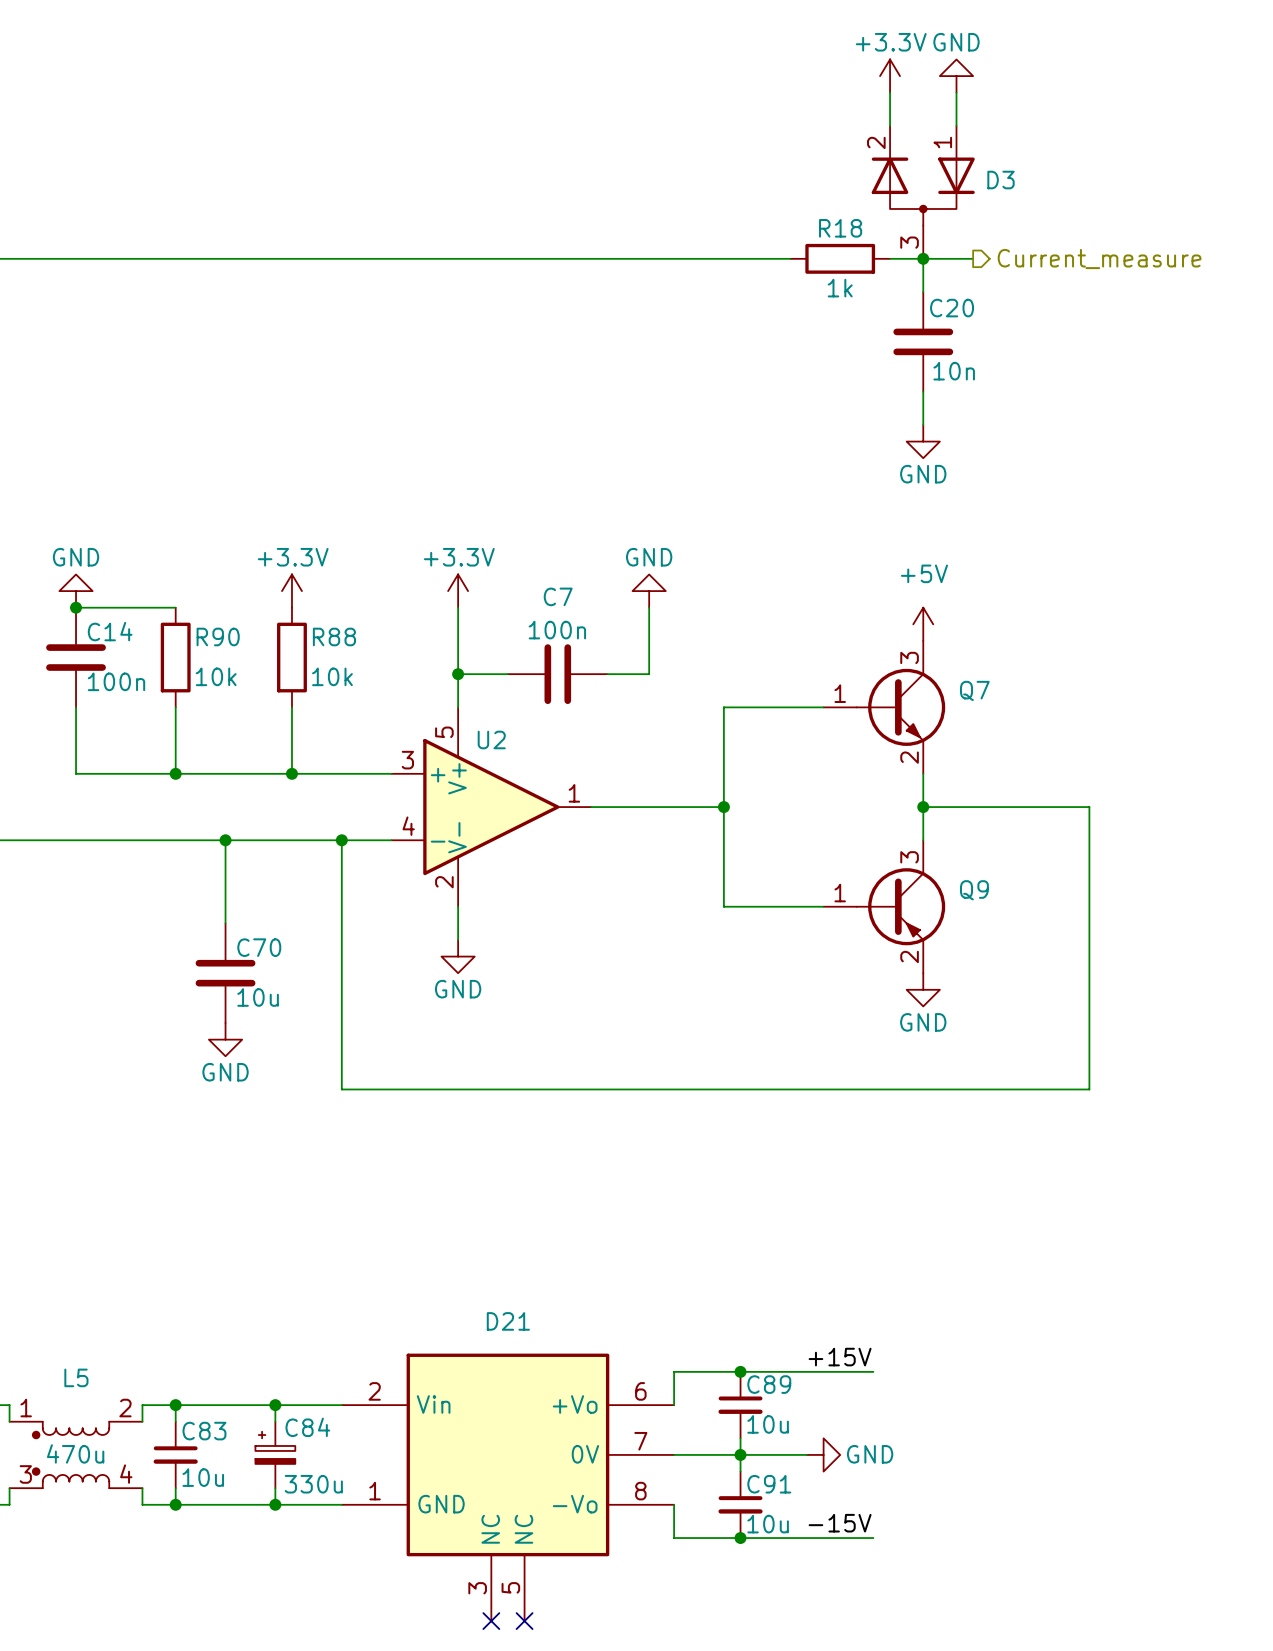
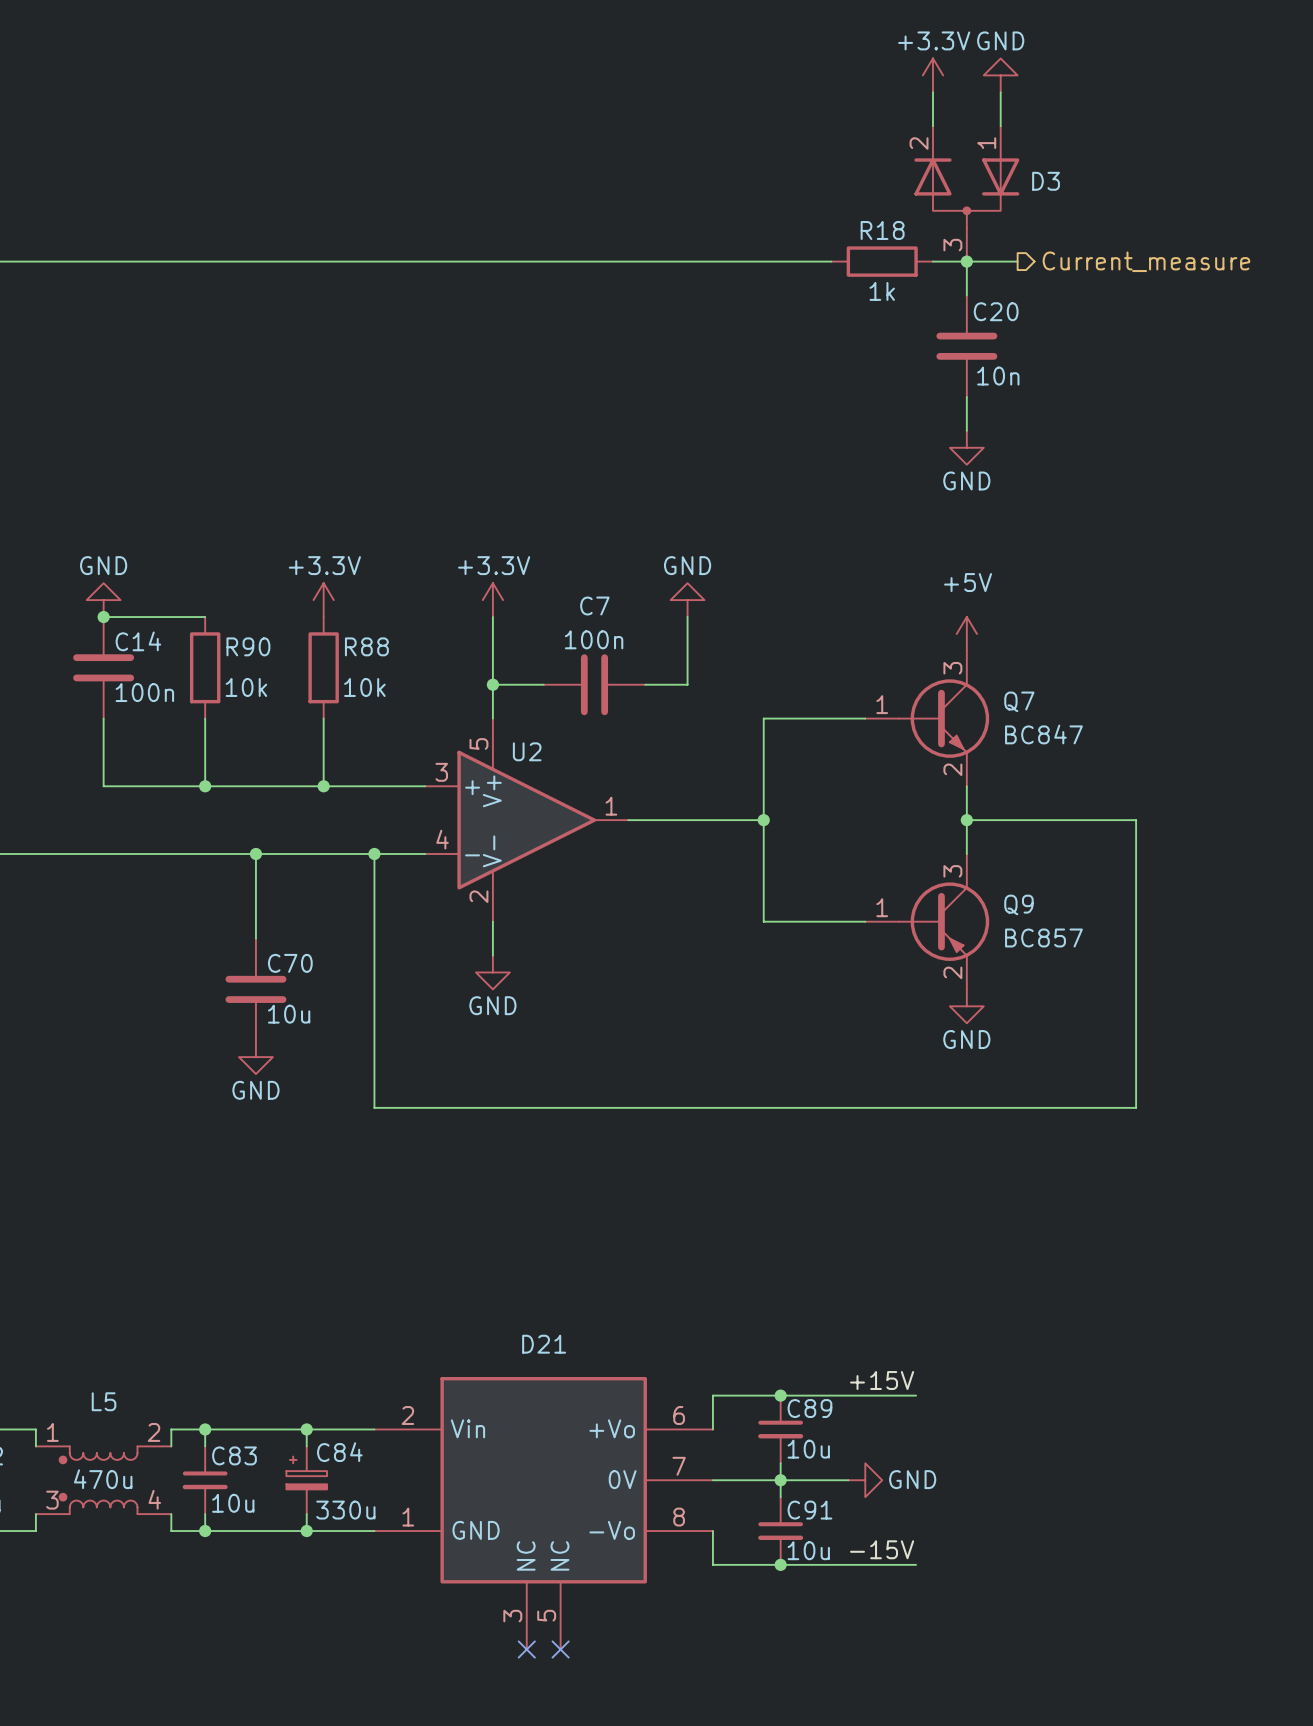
Q7 value: none -> BC847 (1043, 734)
Q9 value: none -> BC857 (1043, 937)

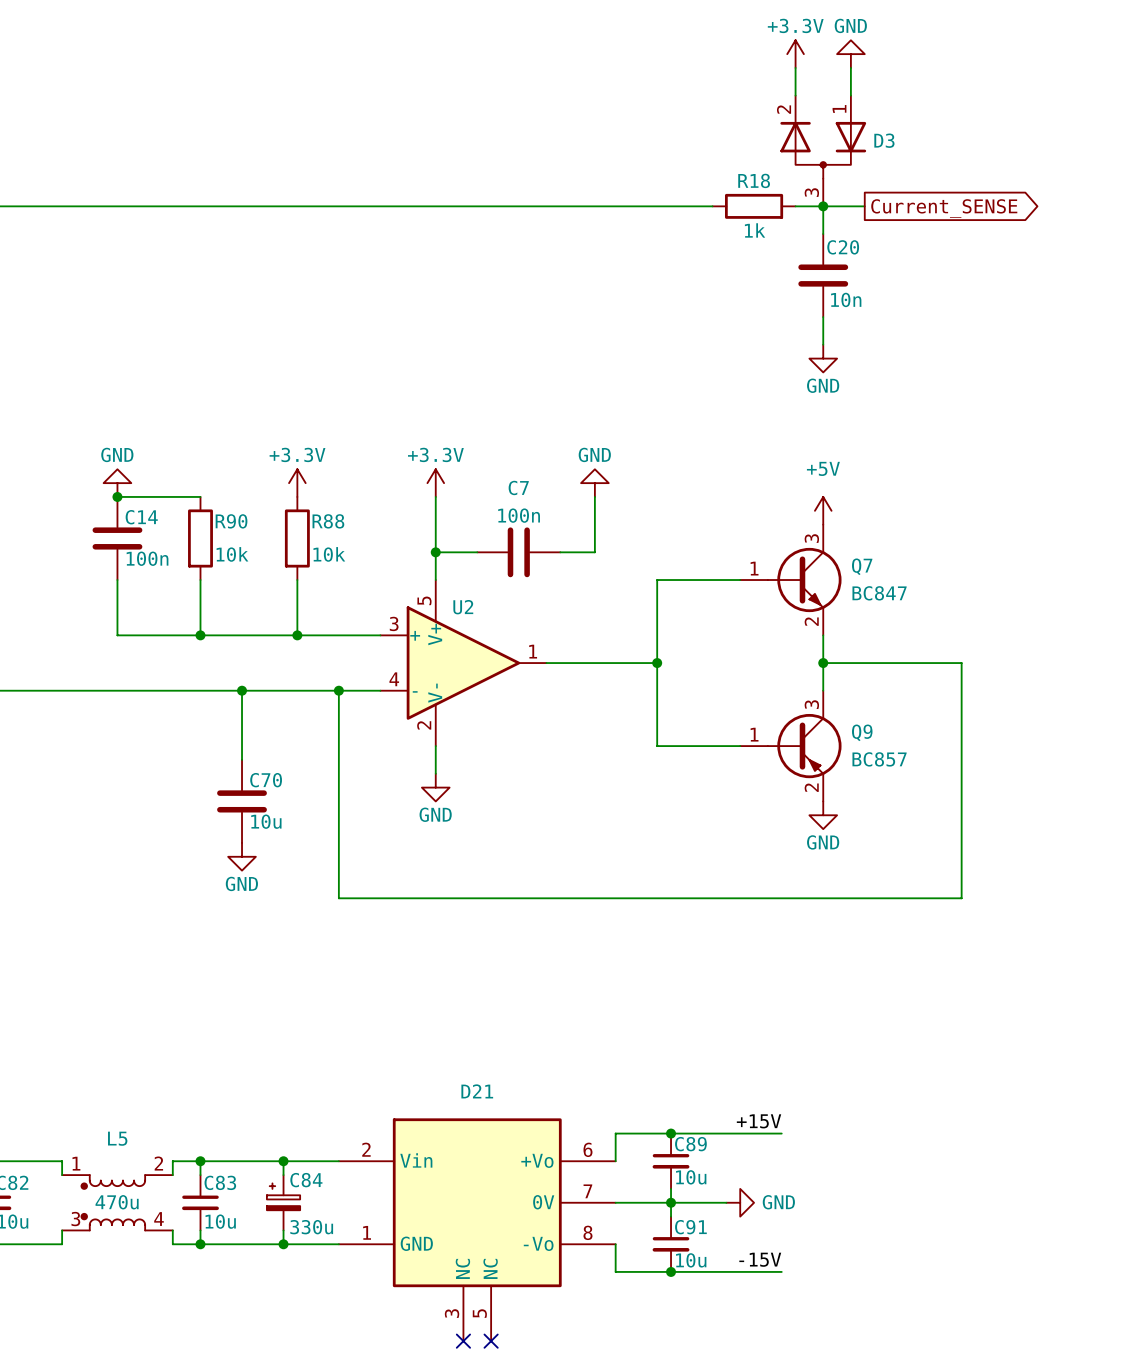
hierarchical label: Current_measure (1146, 261) -> none
global label: none -> Current_SENSE (944, 208)

